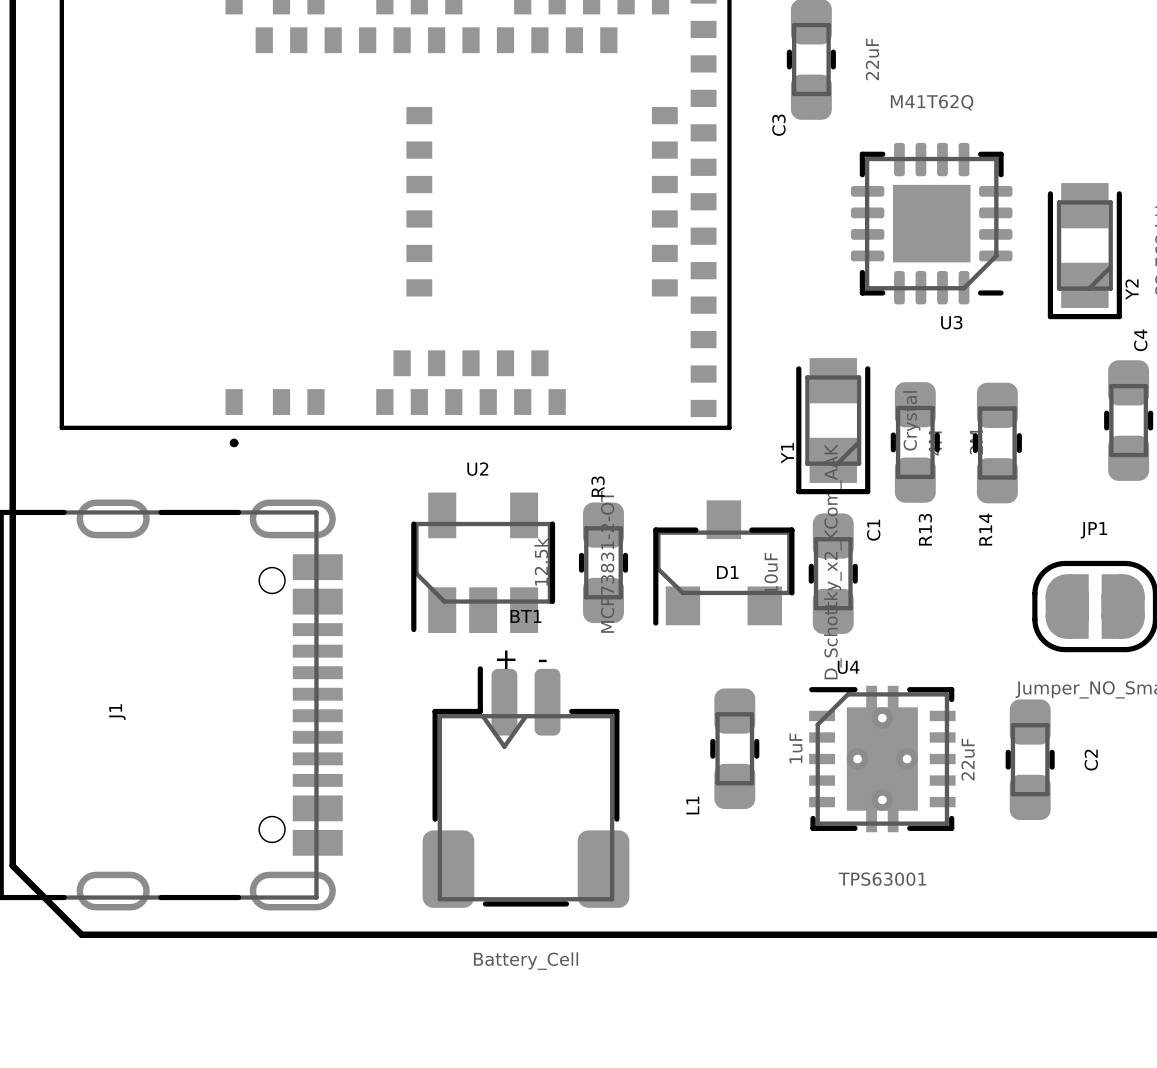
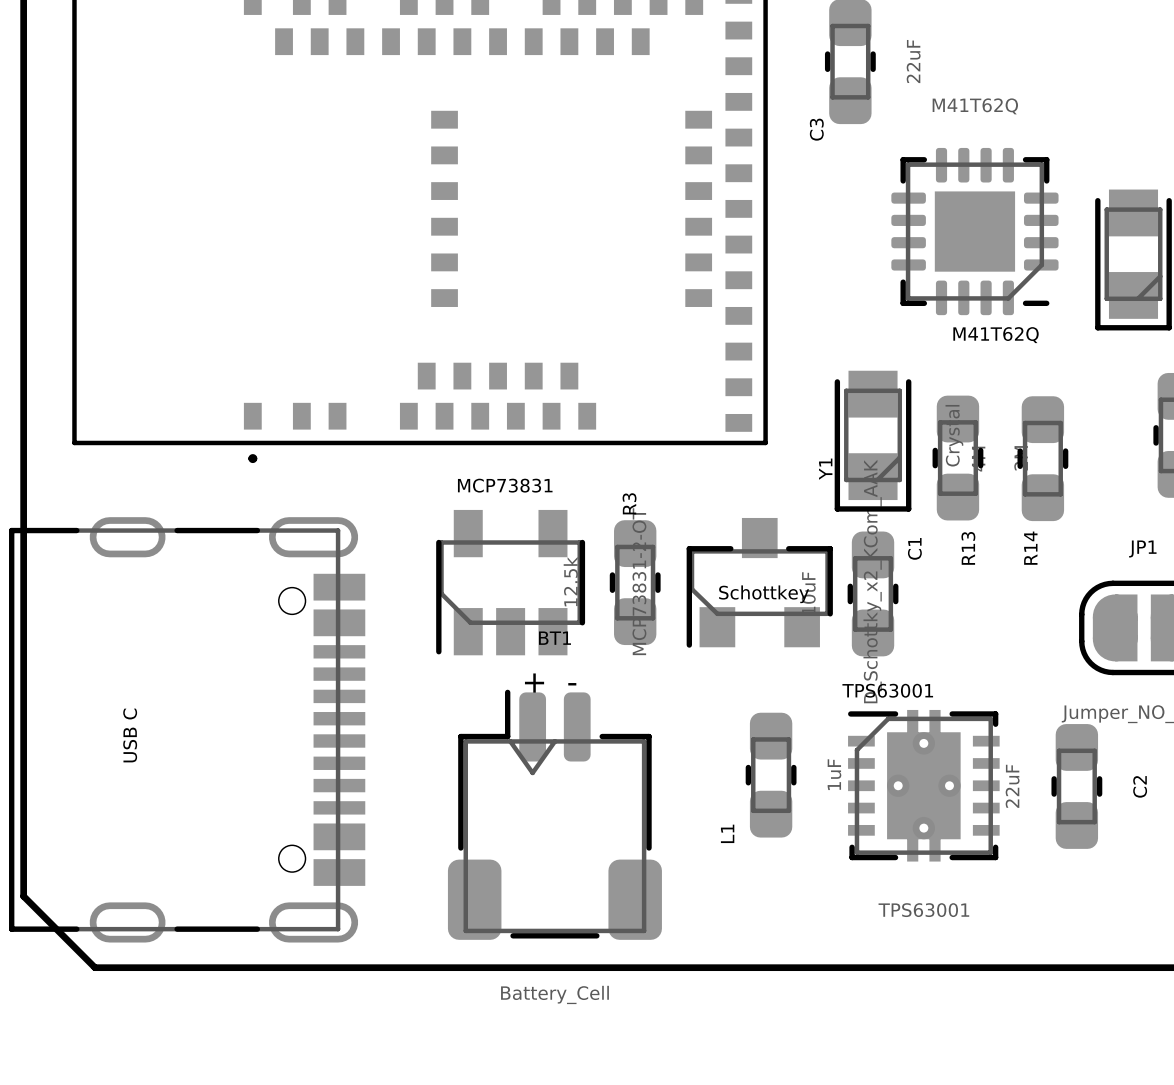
U3 name: U3 (951, 322) -> M41T62Q (996, 335)
U2 name: U2 (477, 469) -> MCP73831 (505, 485)
D1 name: D1 (727, 572) -> Schottkey (764, 594)
U4 name: U4 (848, 667) -> TPS63001 (887, 690)
J1 name: J1 (117, 712) -> USB C (130, 735)

